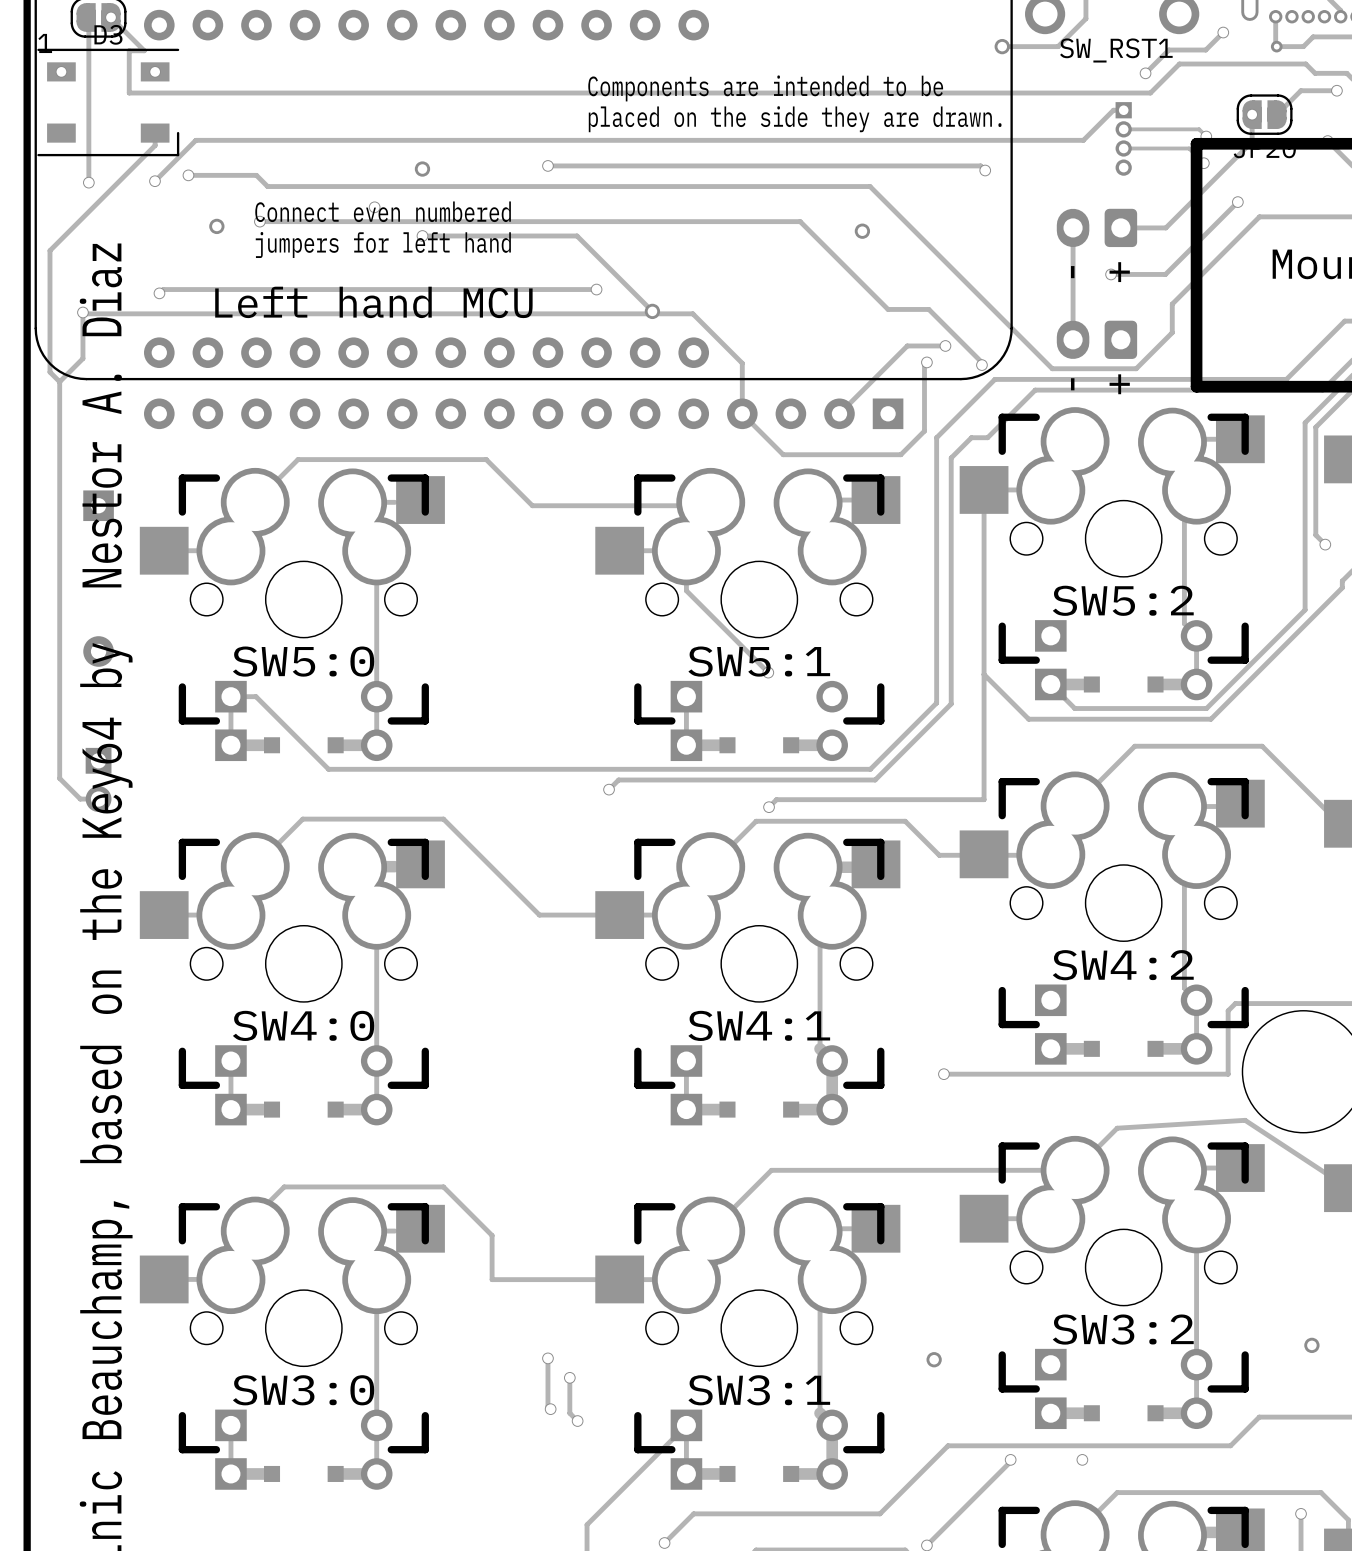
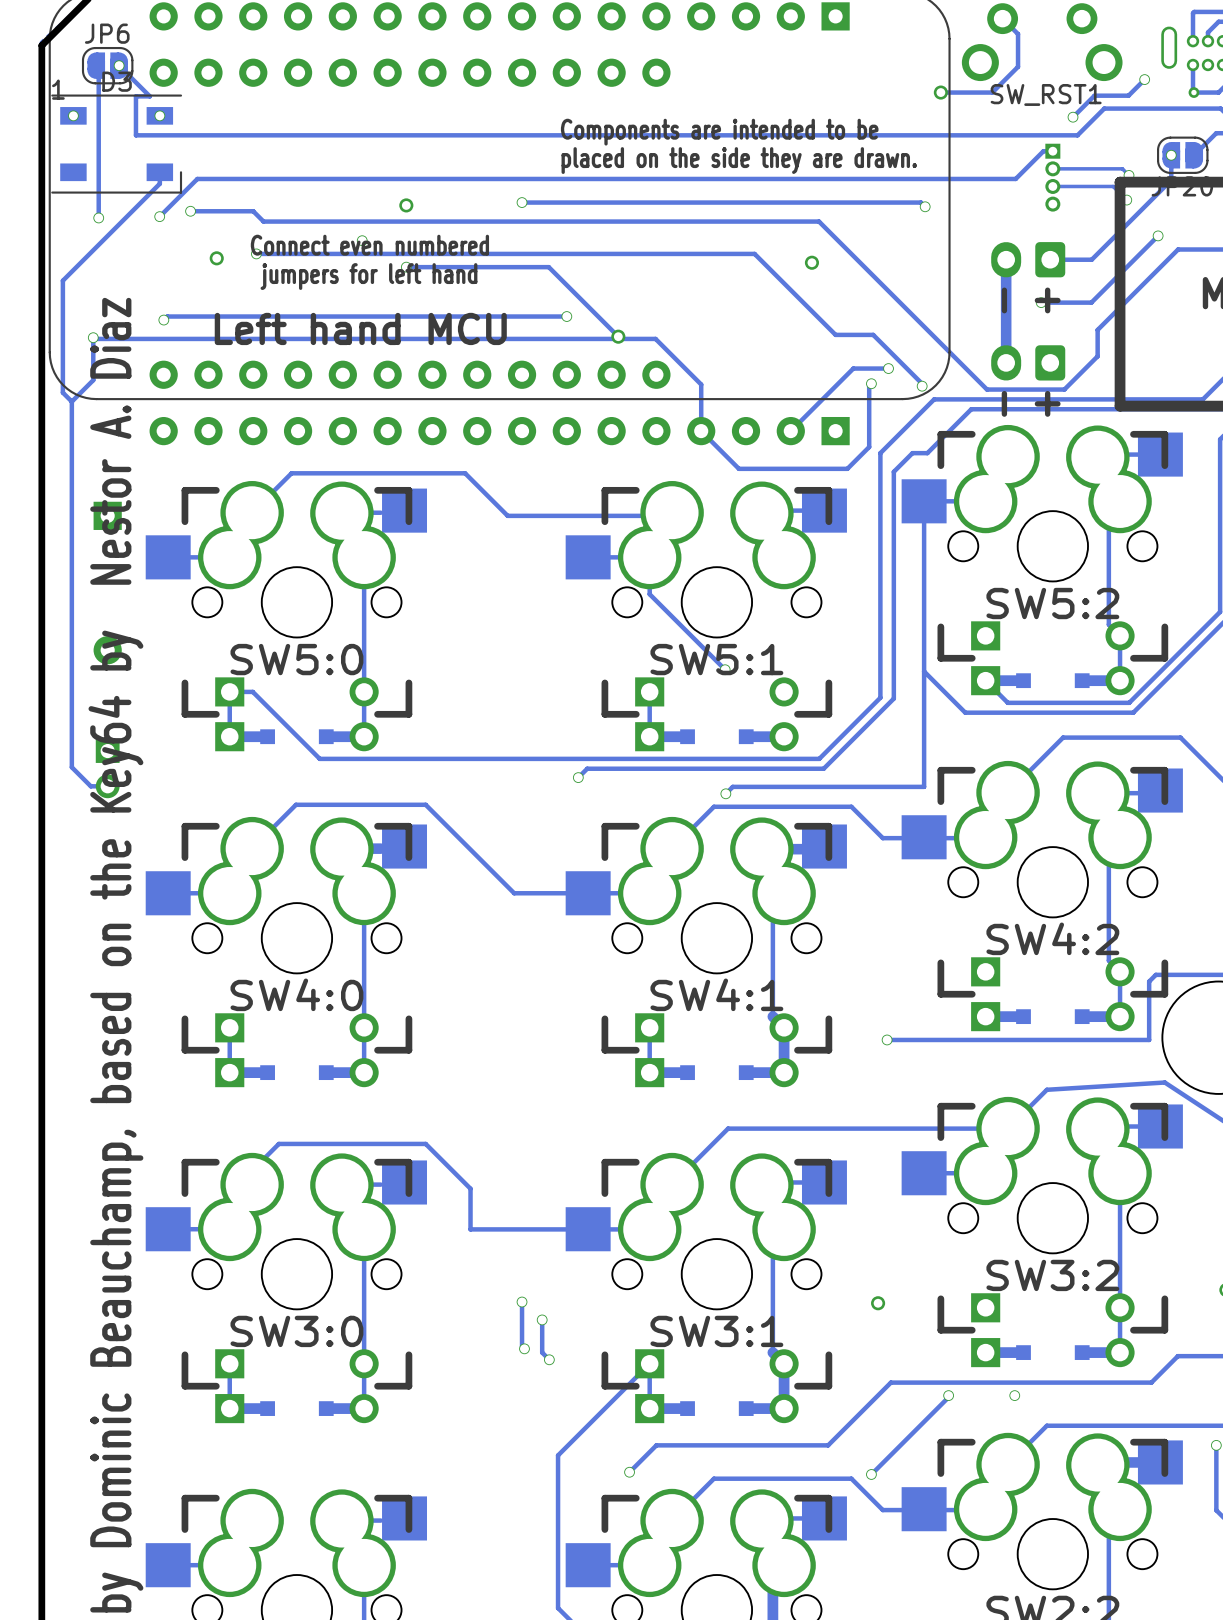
track width: thin (1073, 227) (1073, 339) -> thick (1006, 259) (1006, 362)

